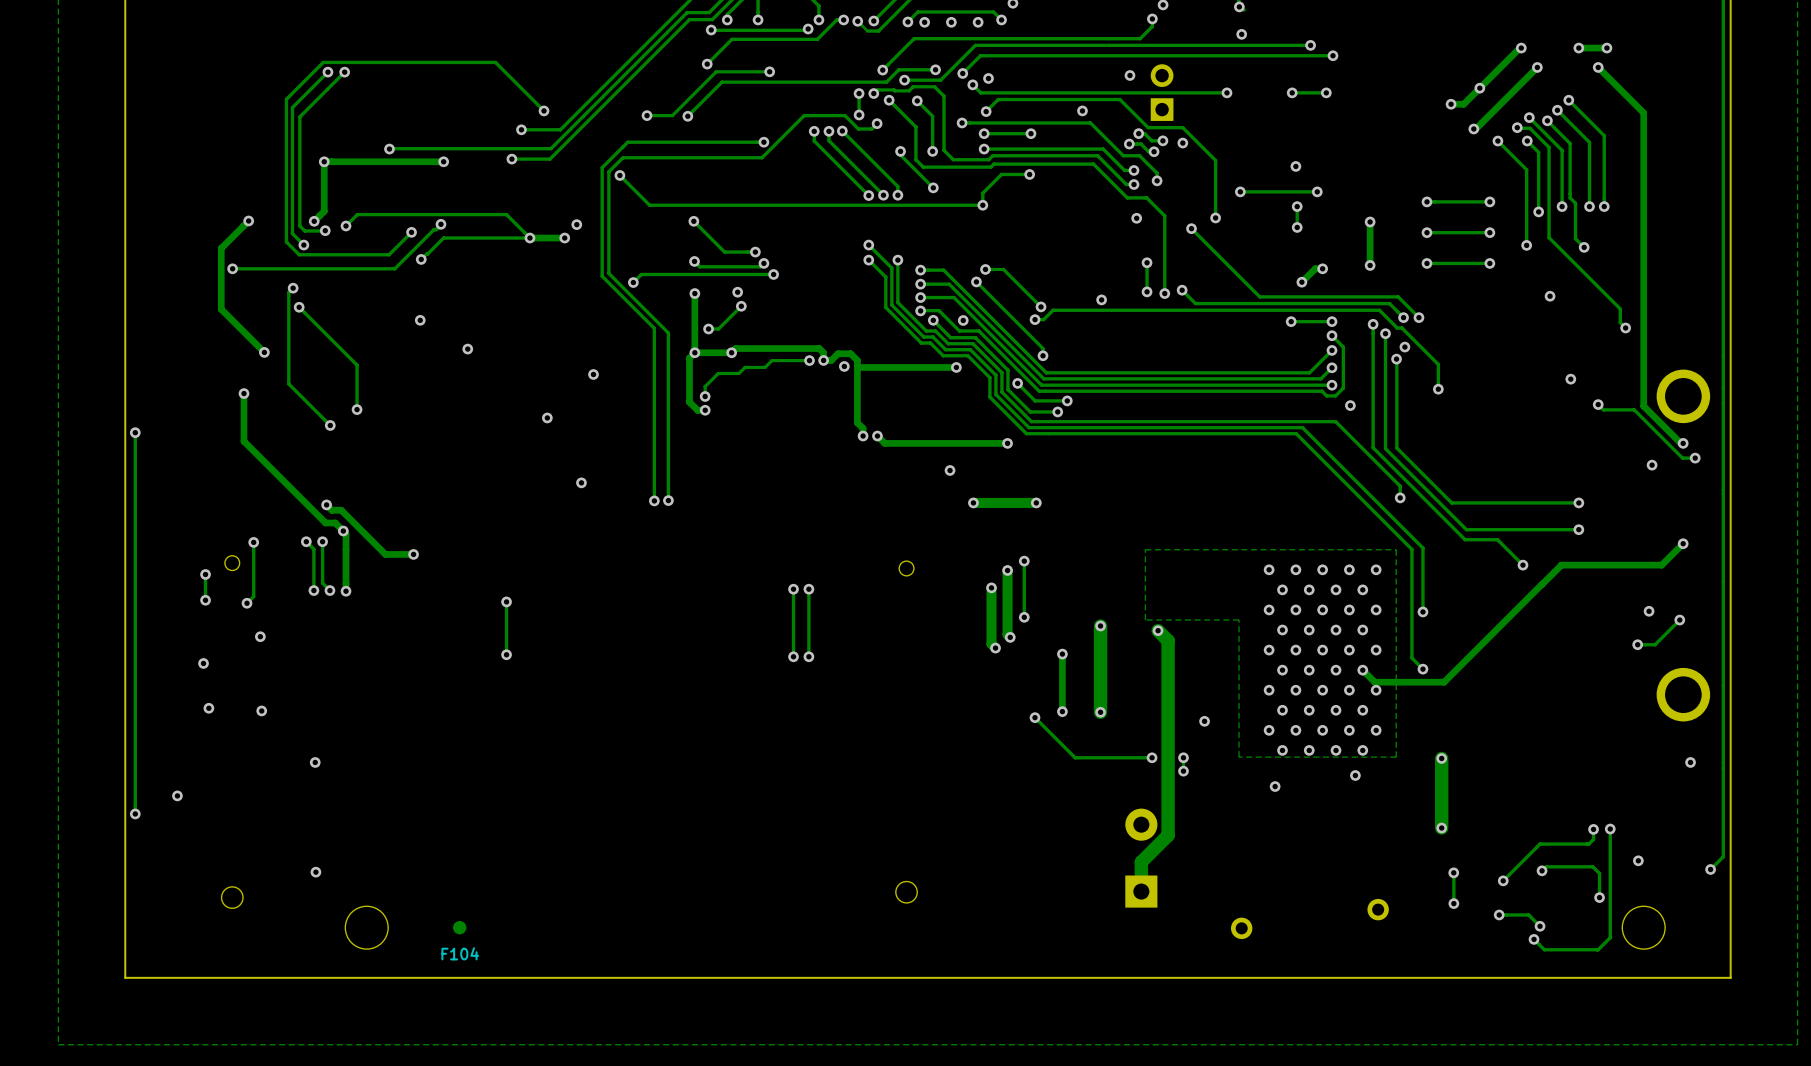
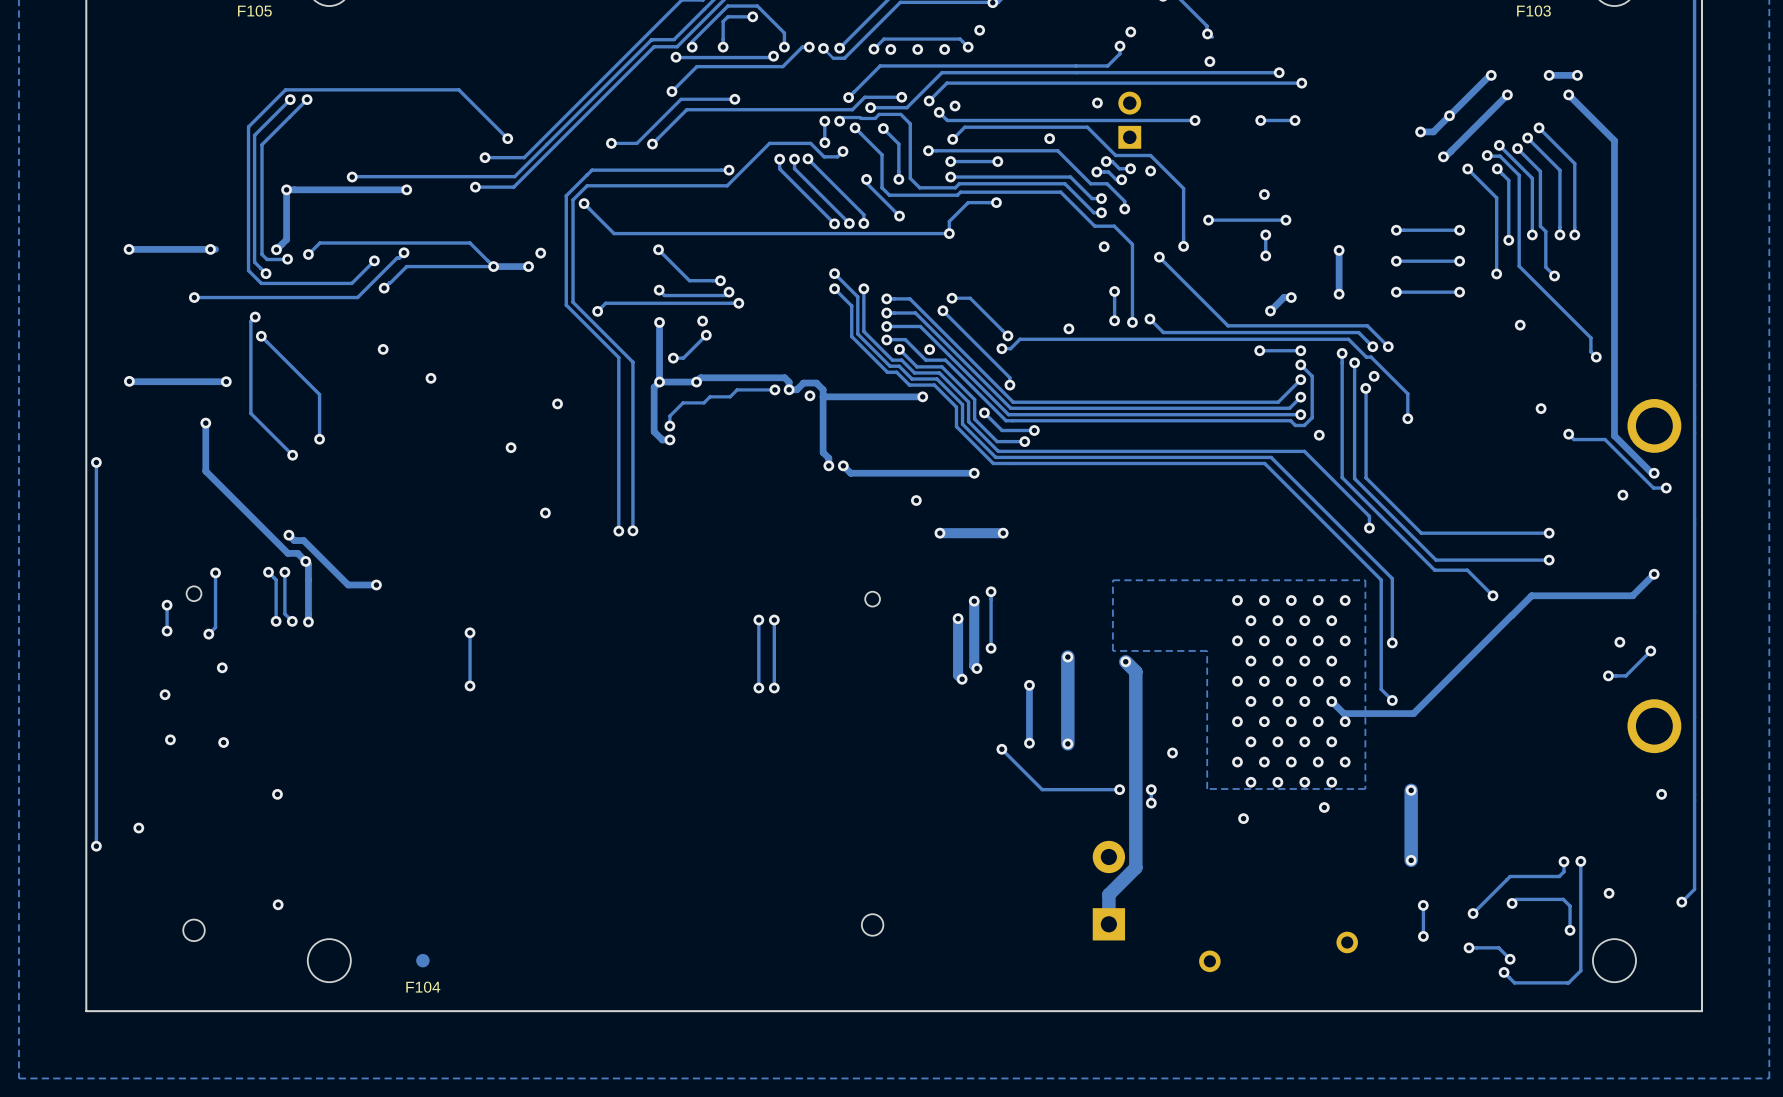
via: none -> (129, 249)
track: (248, 220) (221, 248) (221, 309) (264, 352) -> (129, 381) (226, 381)
track: none -> (215, 249) (129, 249)
via: none -> (129, 381)

